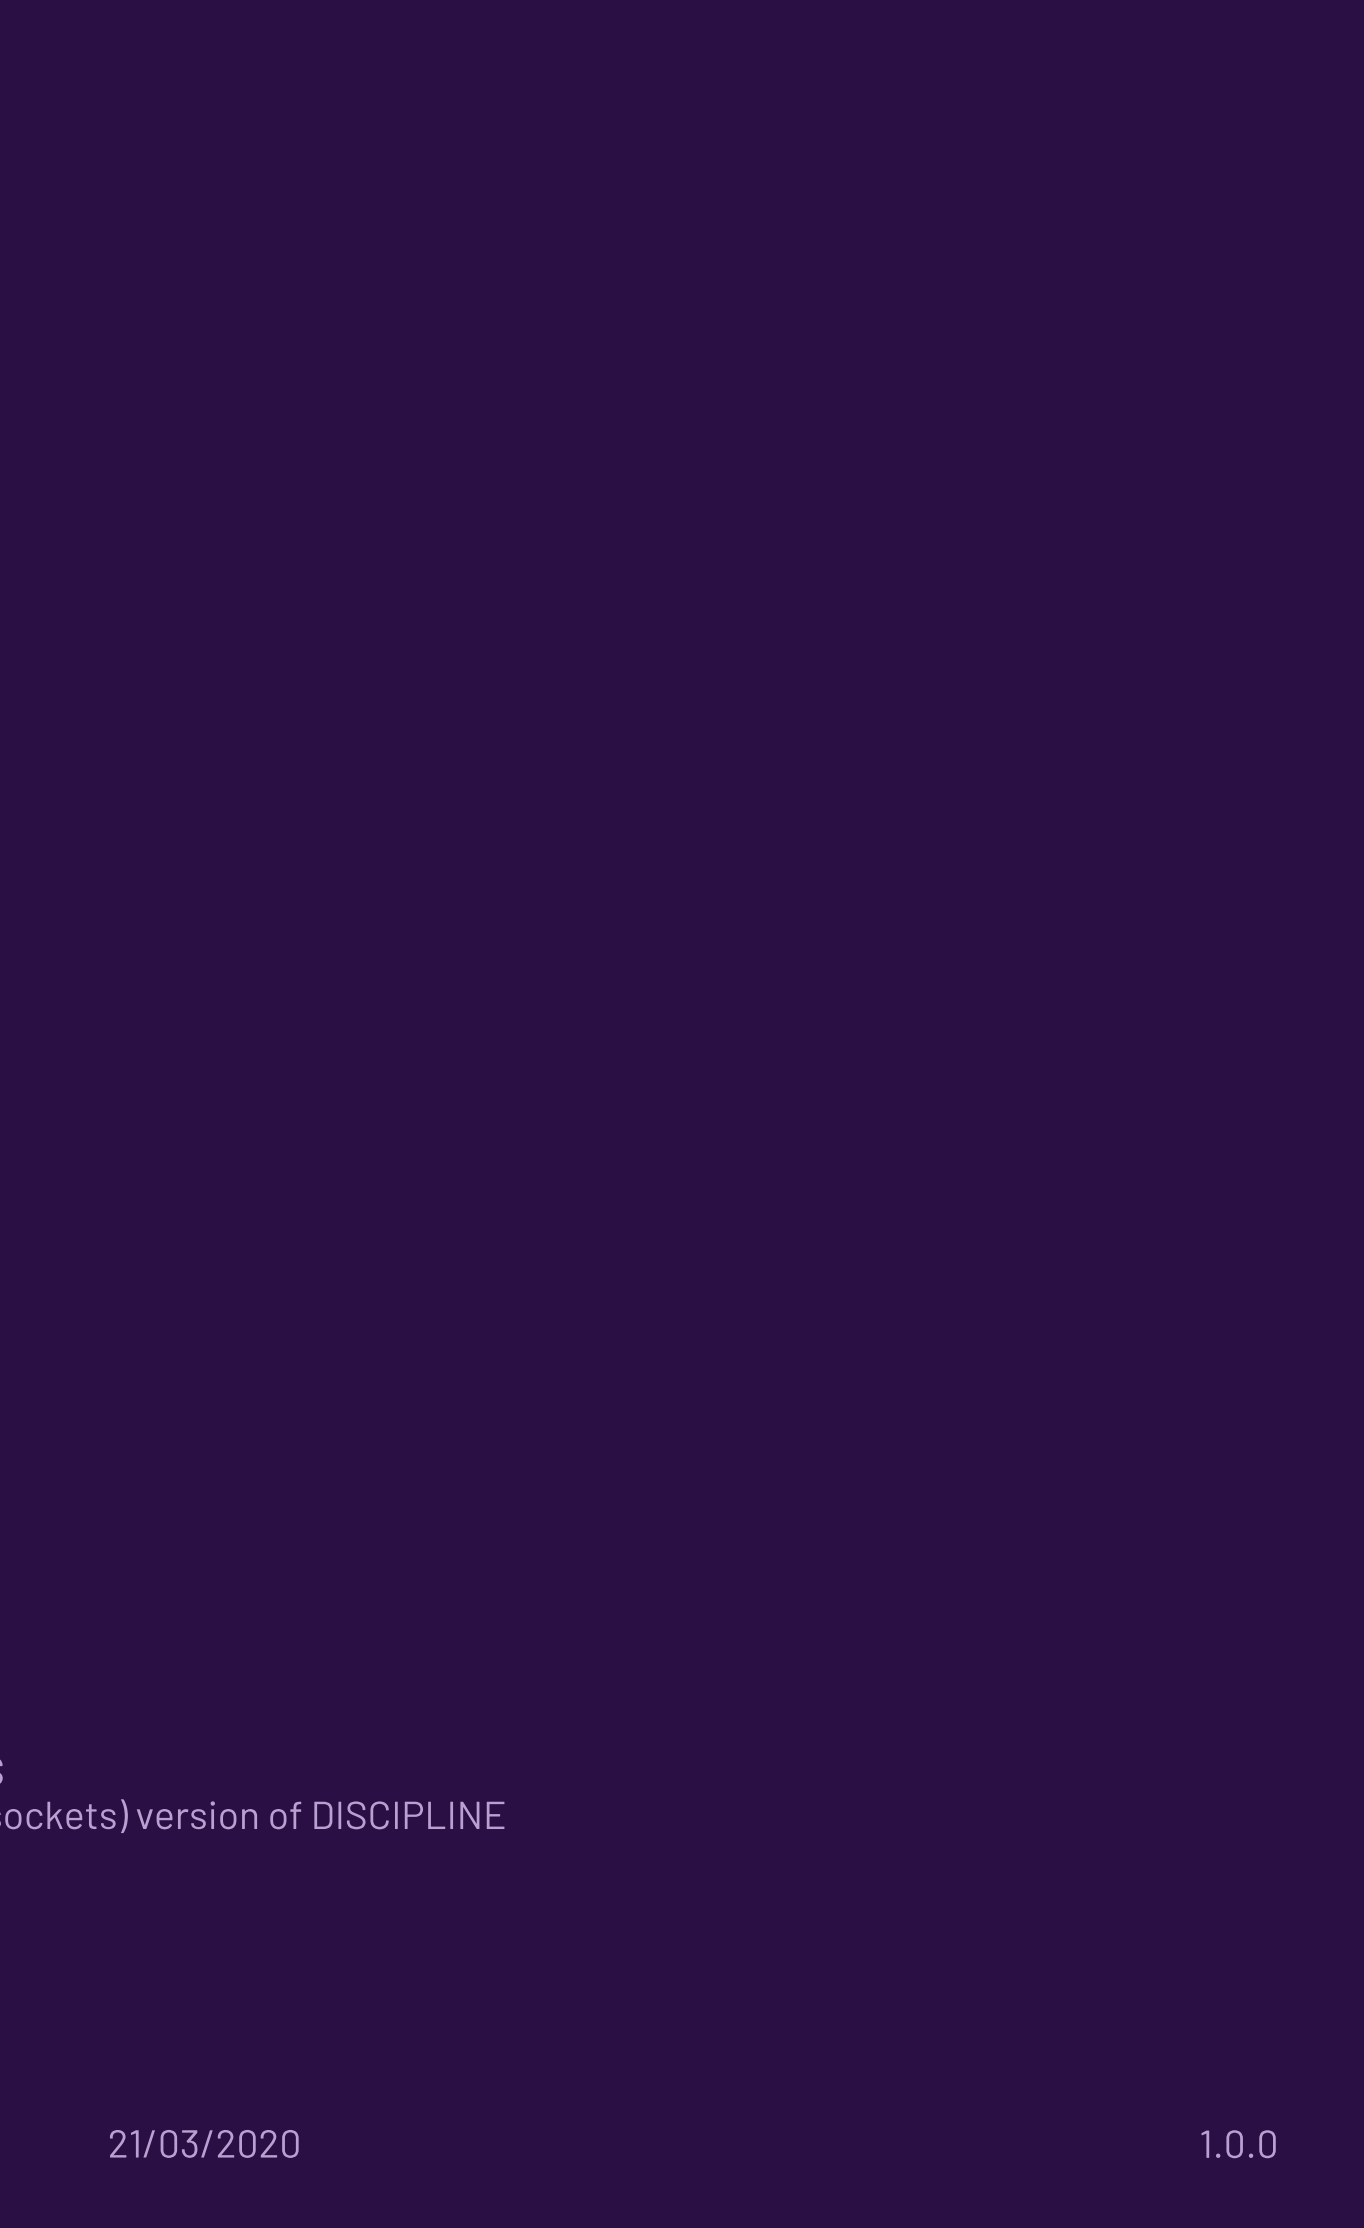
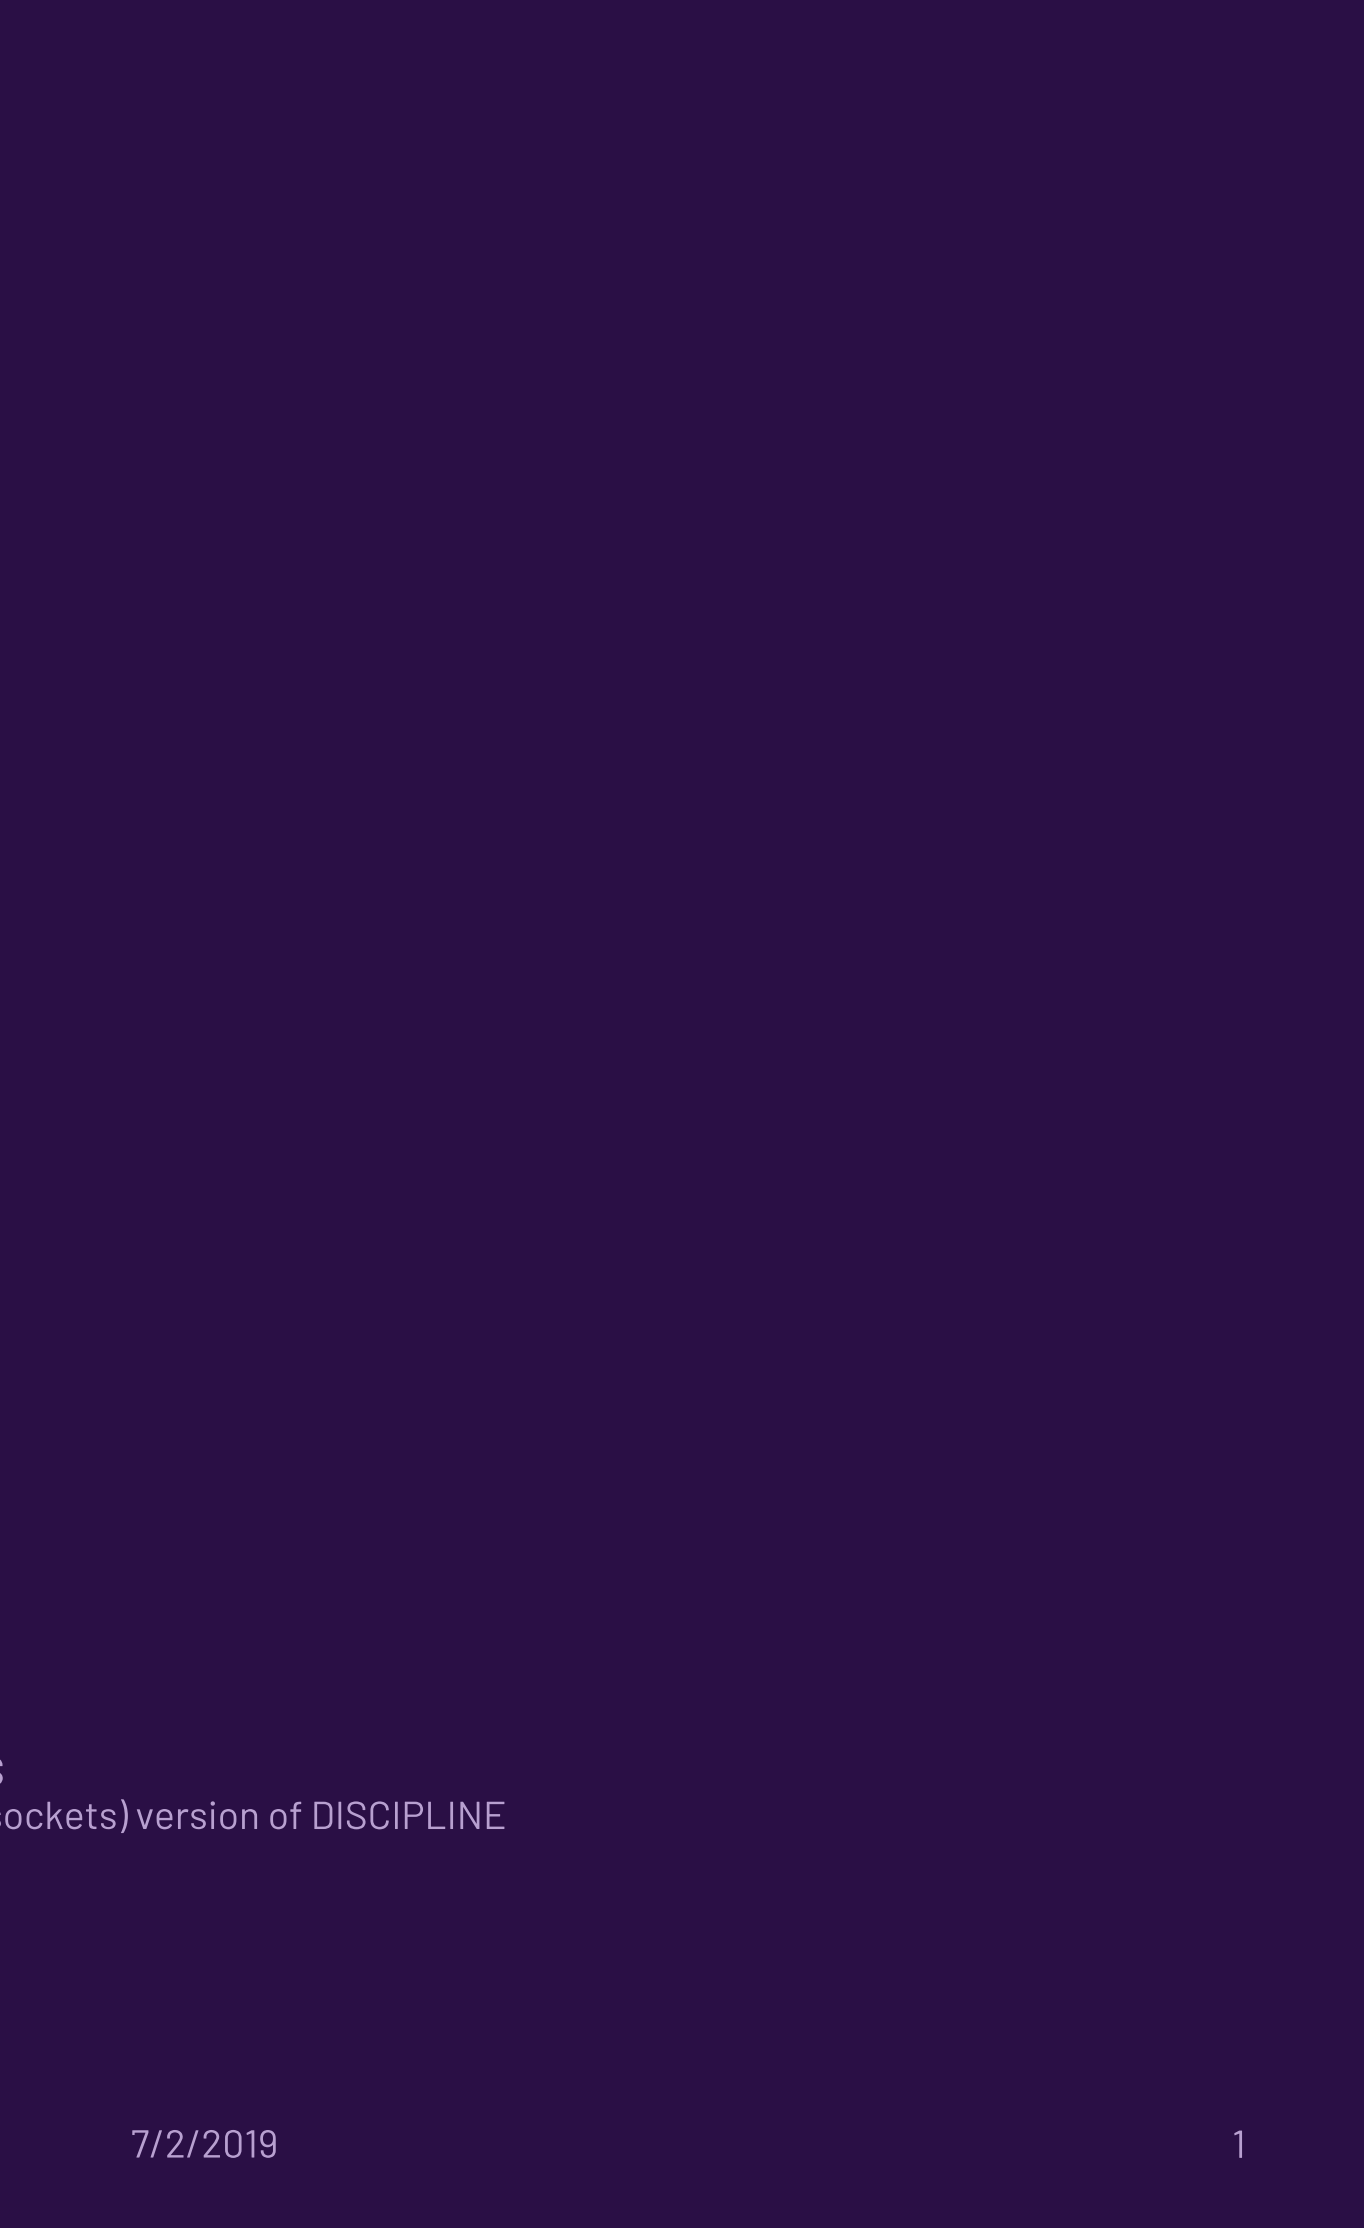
text: 21/03/2020 (204, 2143) -> 7/2/2019 (204, 2143)
text: 1.0.0 (1238, 2144) -> 1 (1238, 2144)

